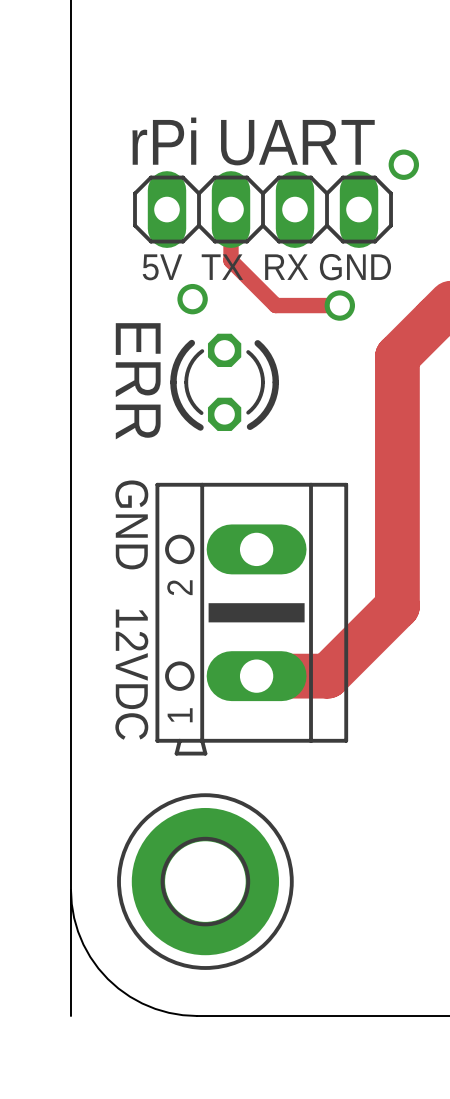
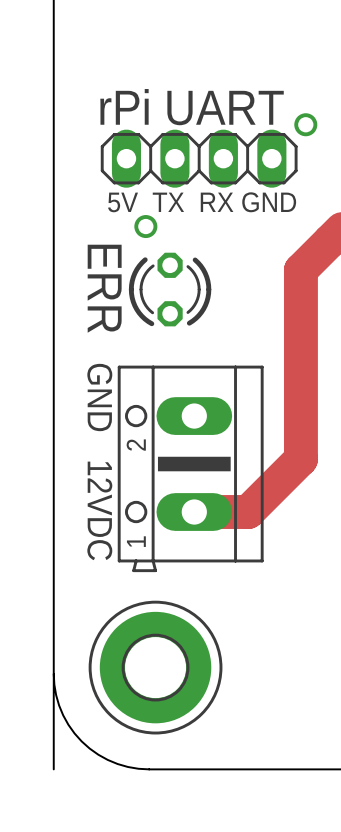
track: (231, 209) (231, 260) (275, 305) (339, 305) -> none
via: (339, 305) -> none

